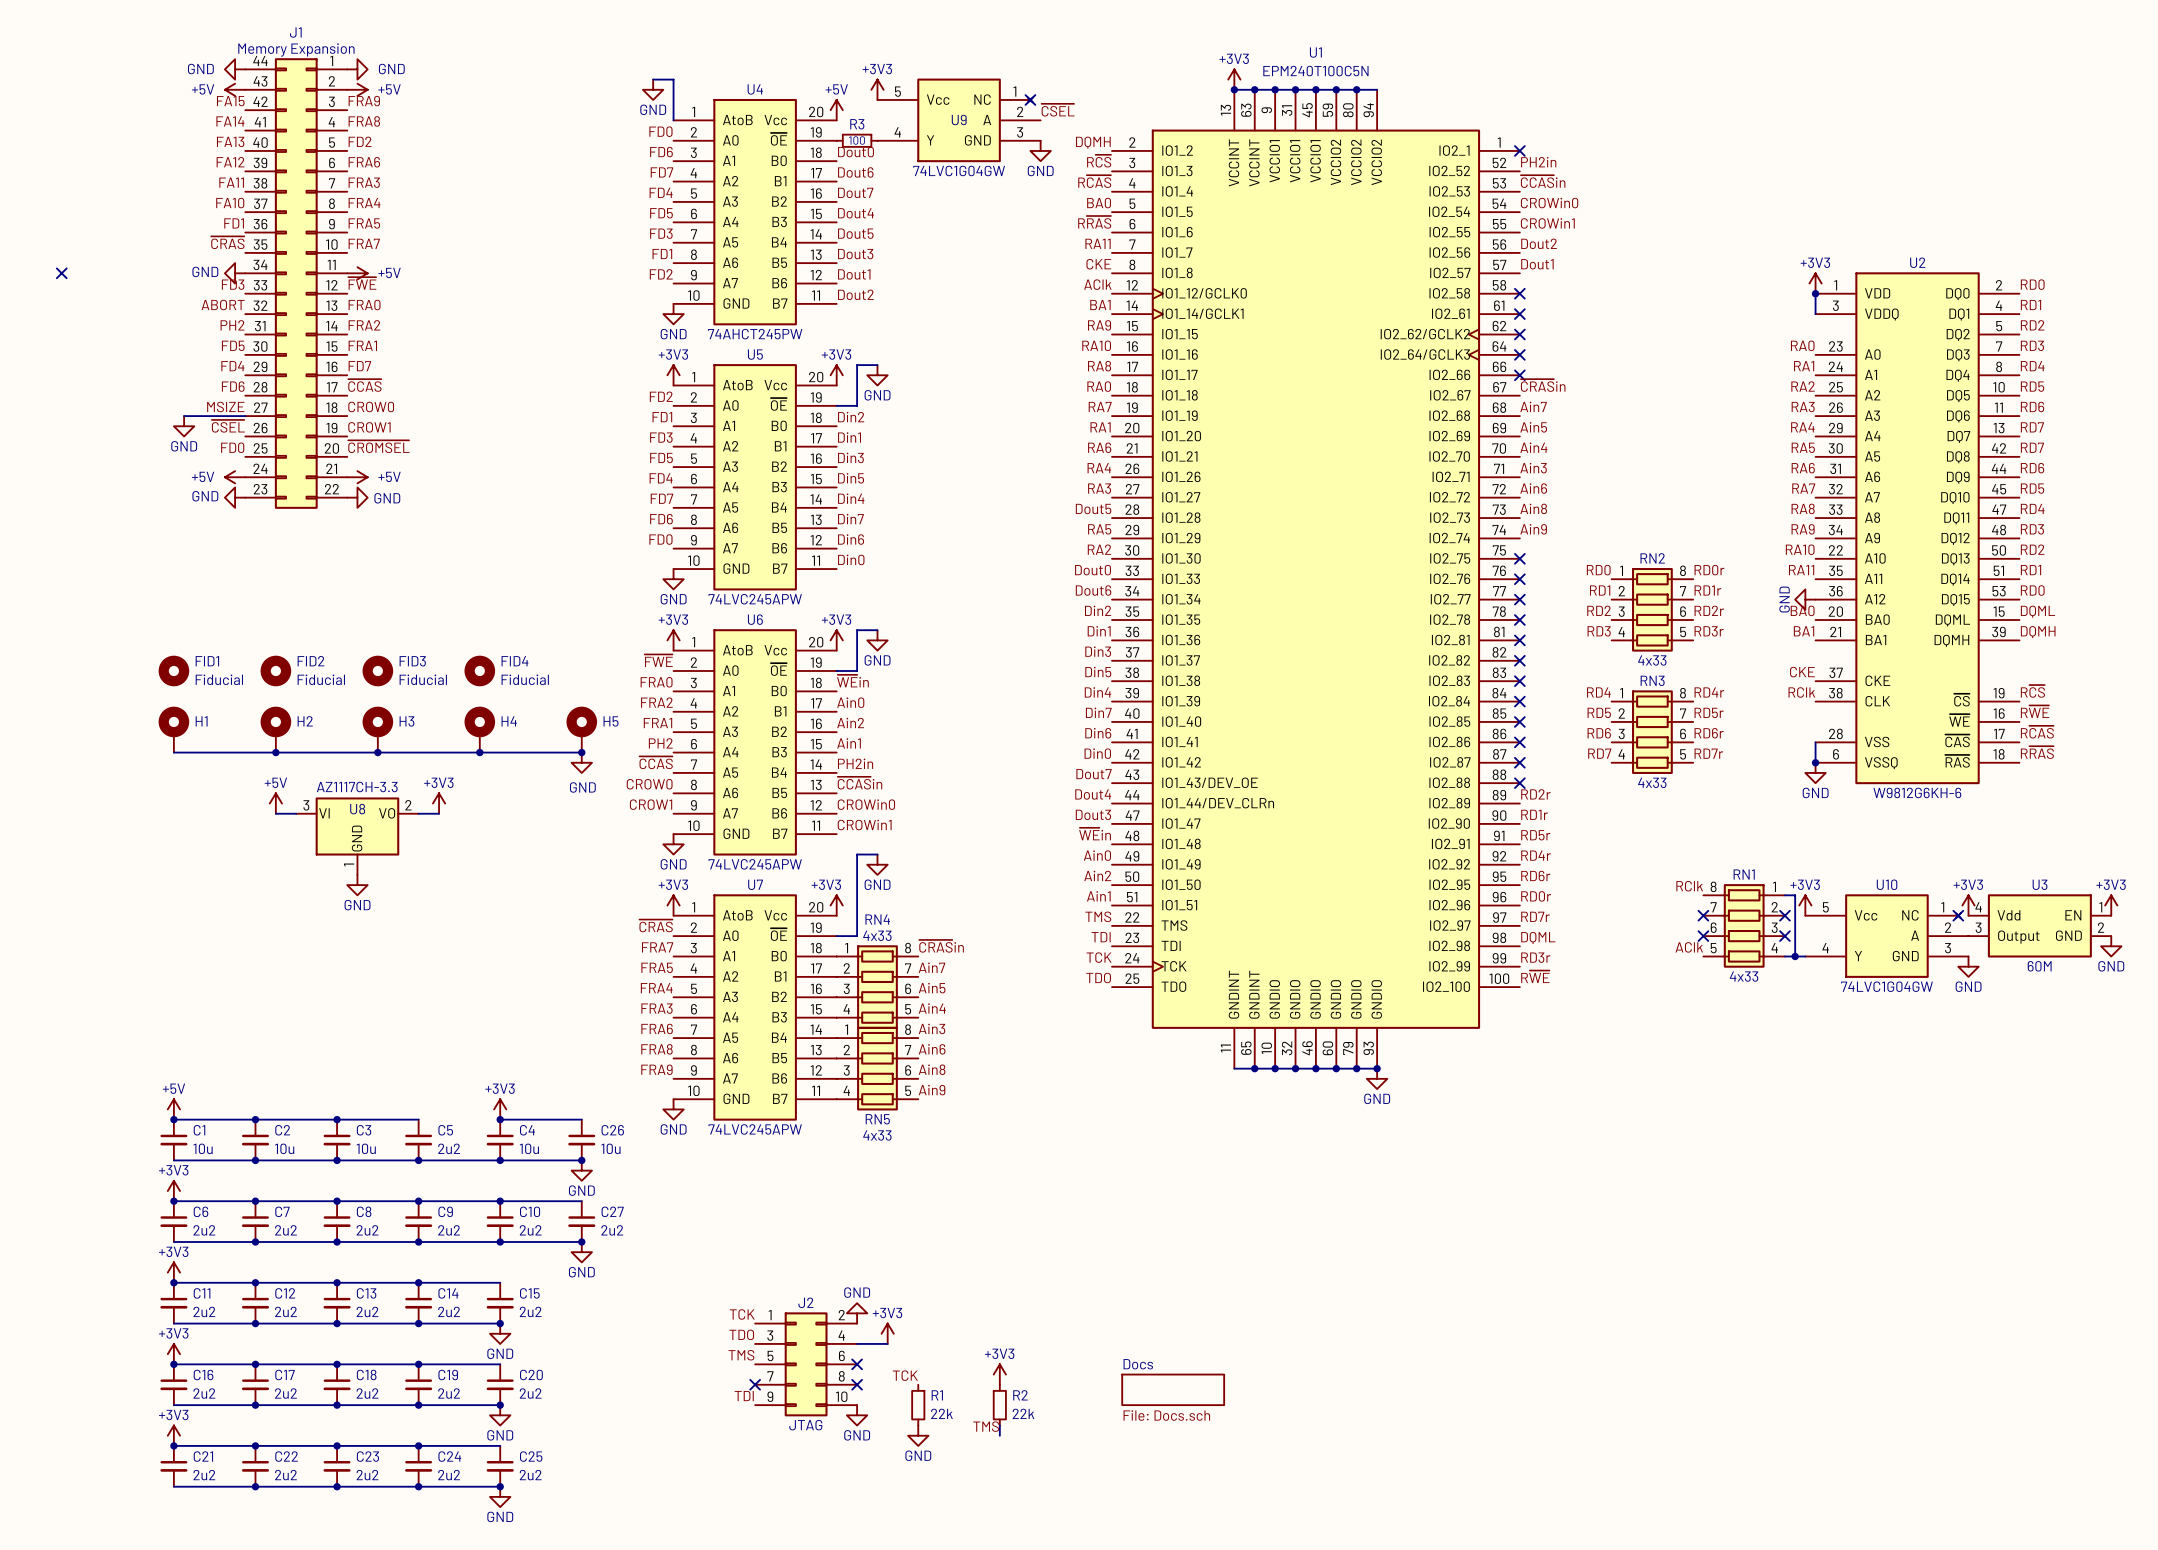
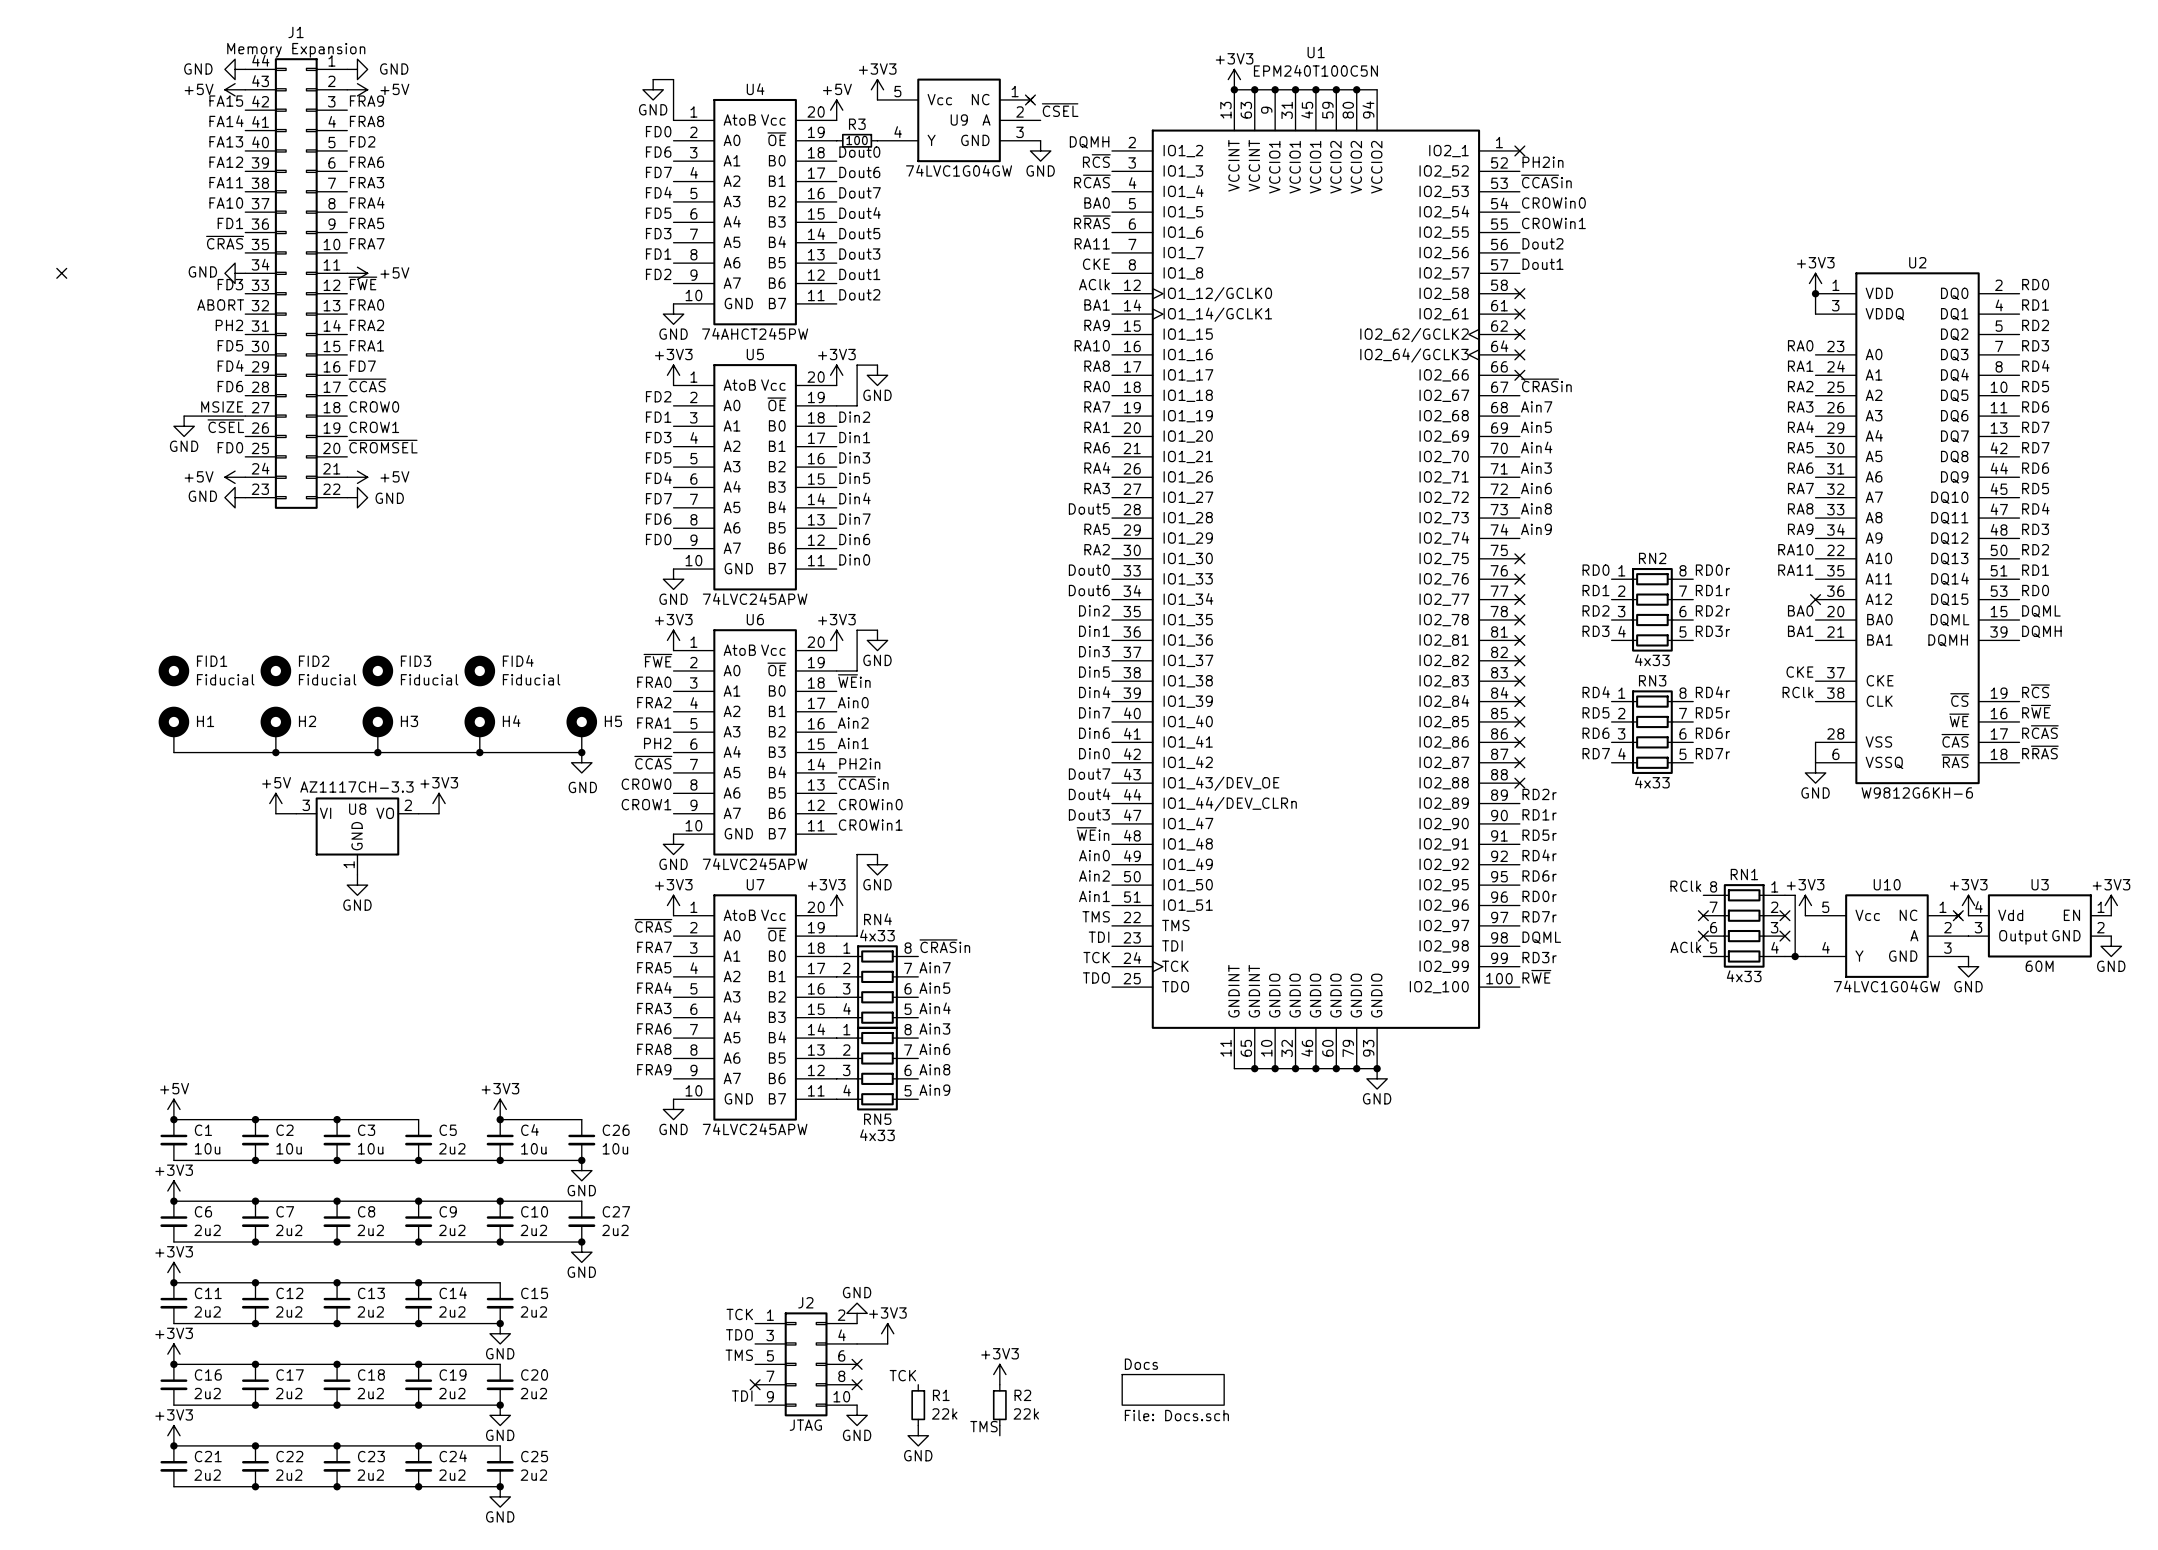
power symbol: GND (1805, 599) -> none
no-connect mark: none -> (1815, 599)
junction: (1815, 762) -> none

